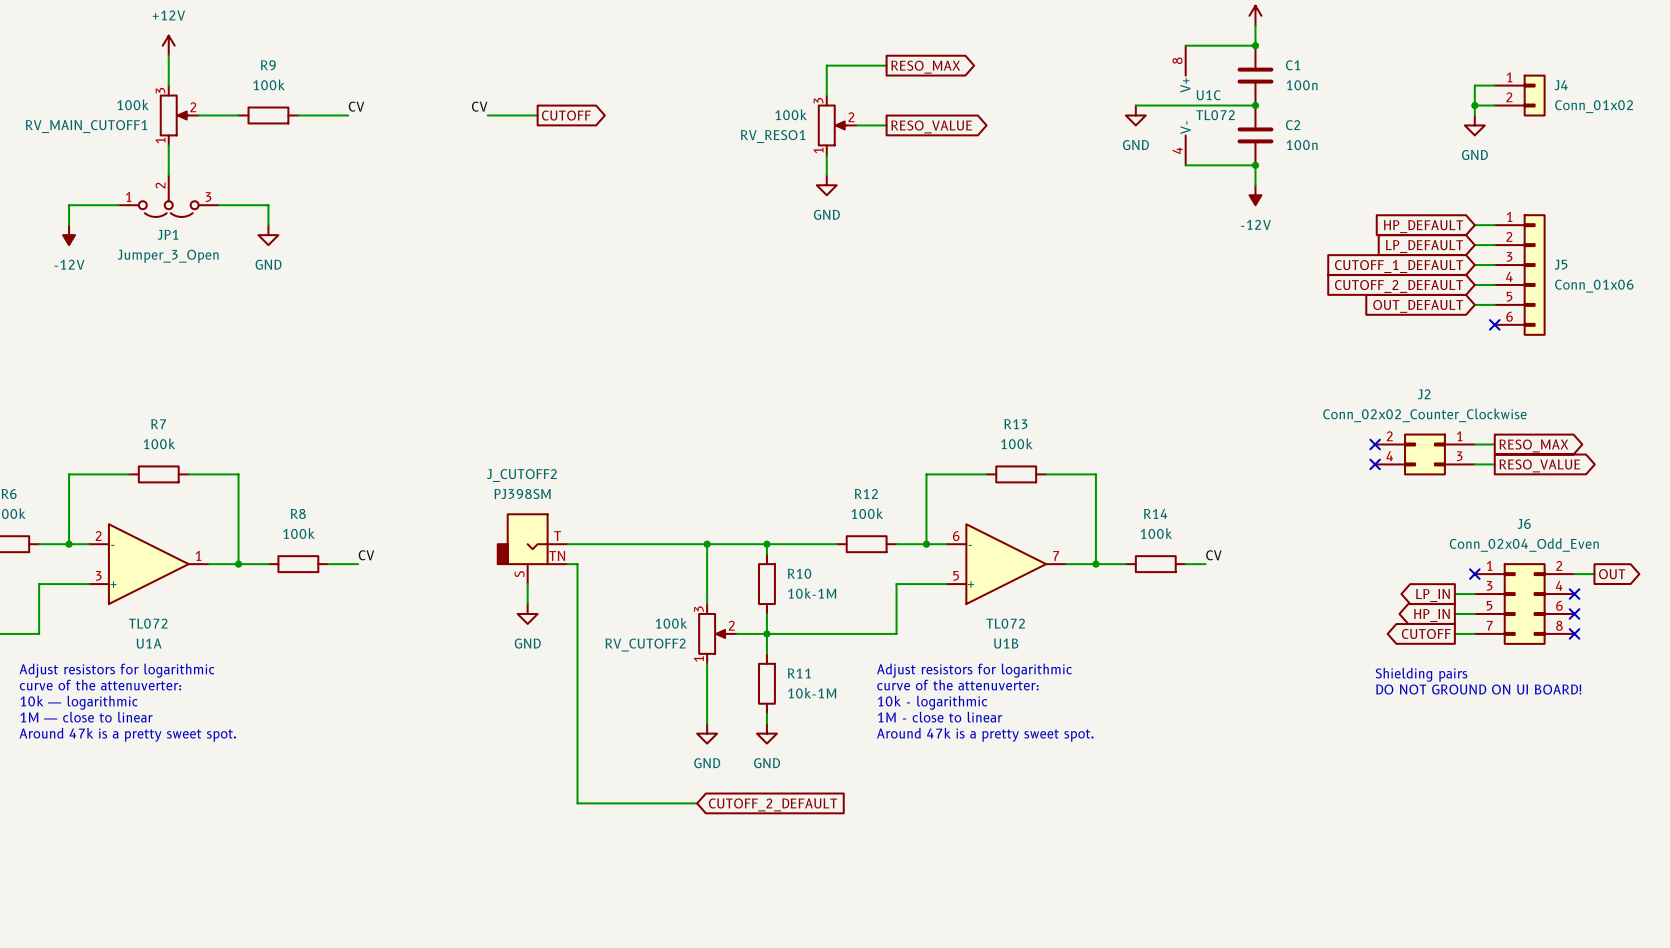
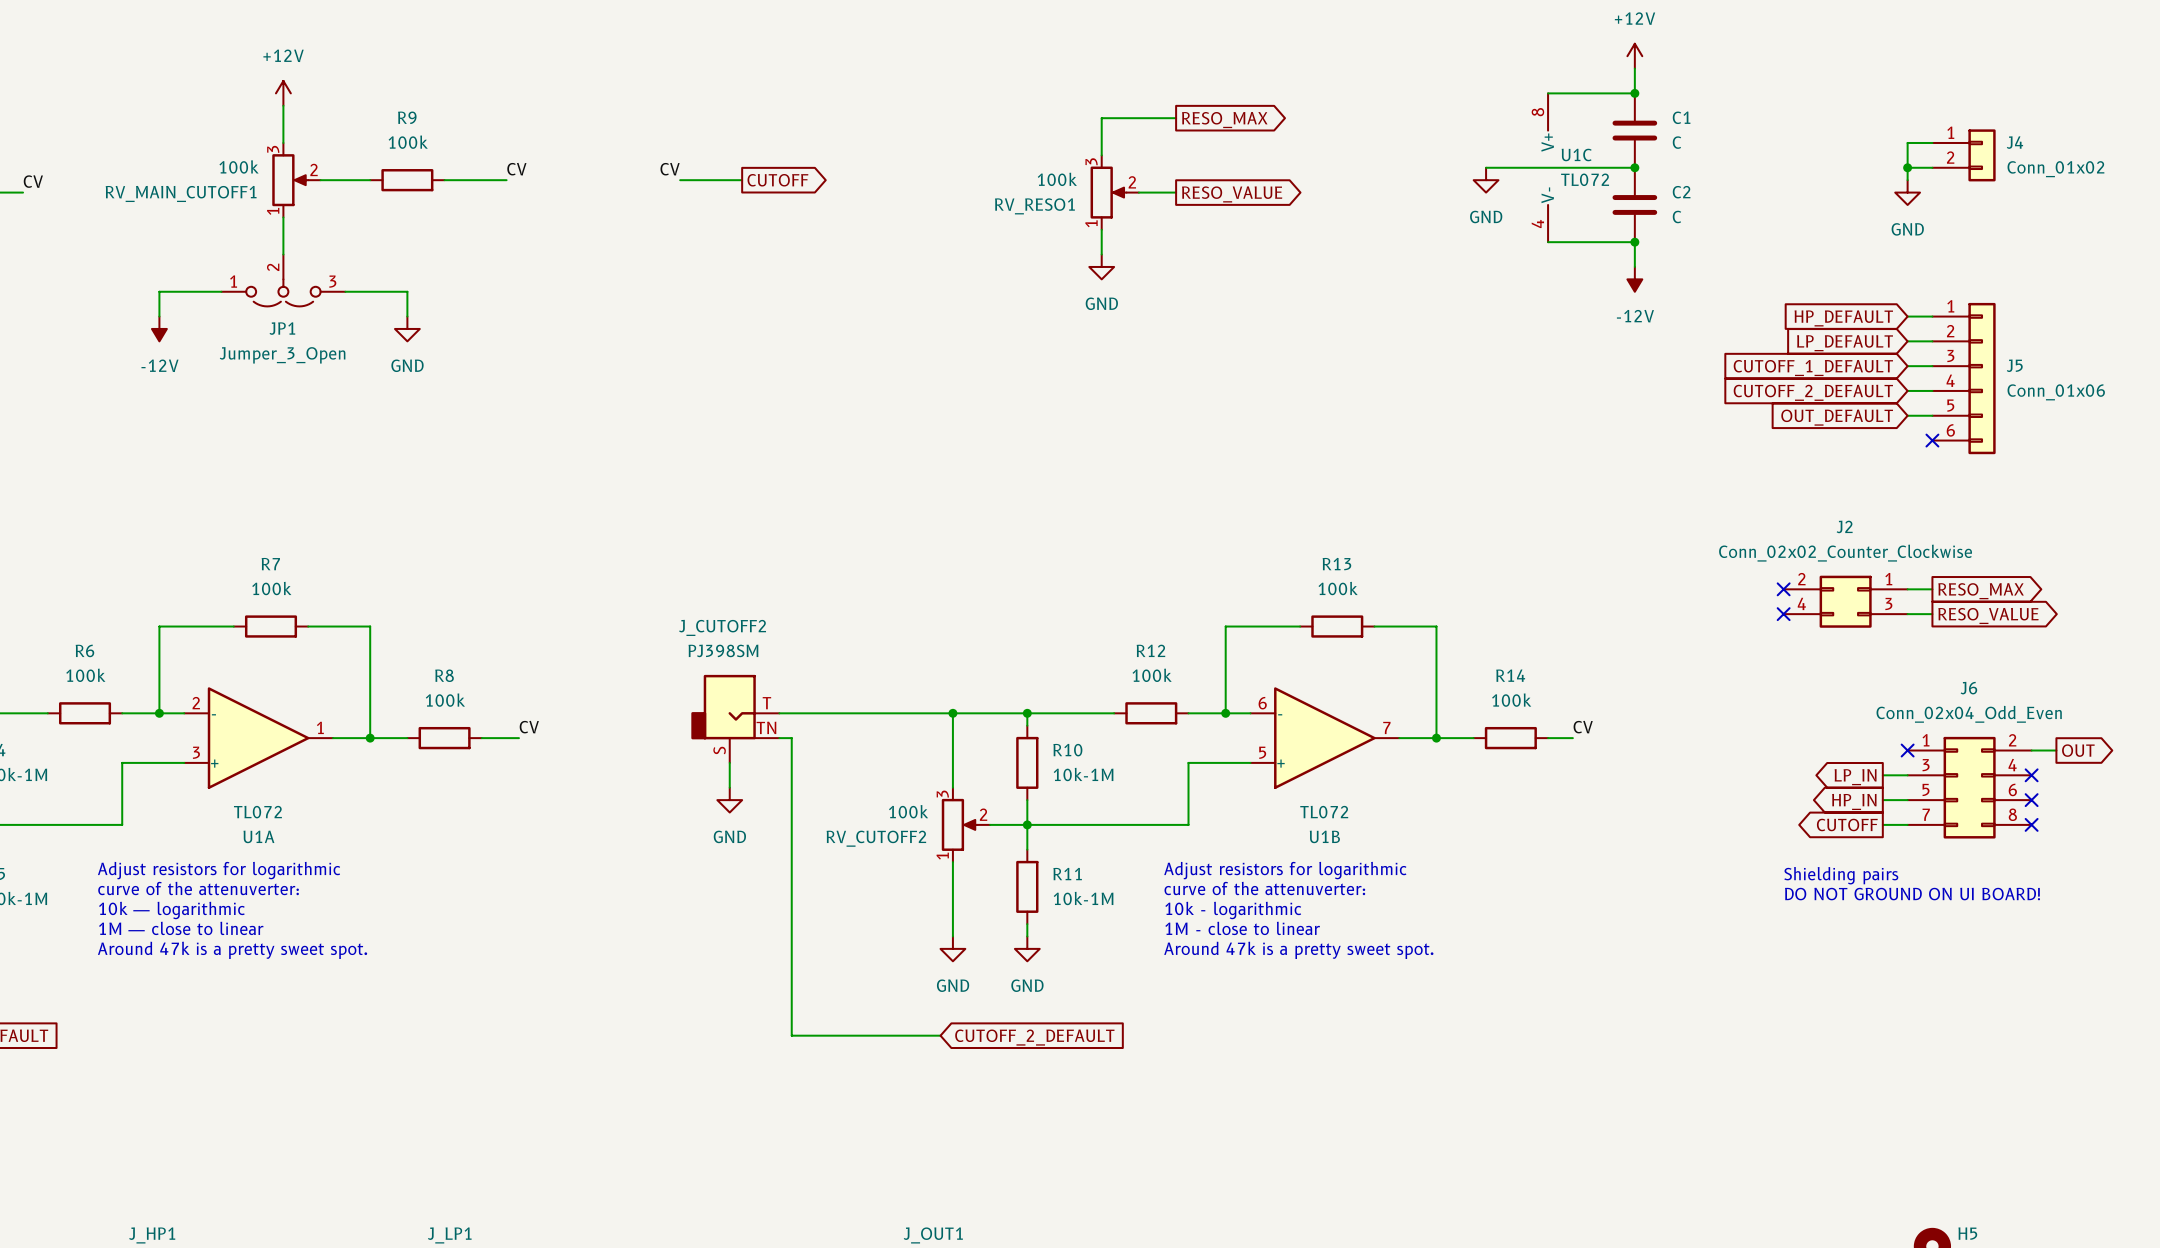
C1 value: 100n (1302, 85) -> C (1676, 142)
C2 value: 100n (1302, 145) -> C (1676, 216)

